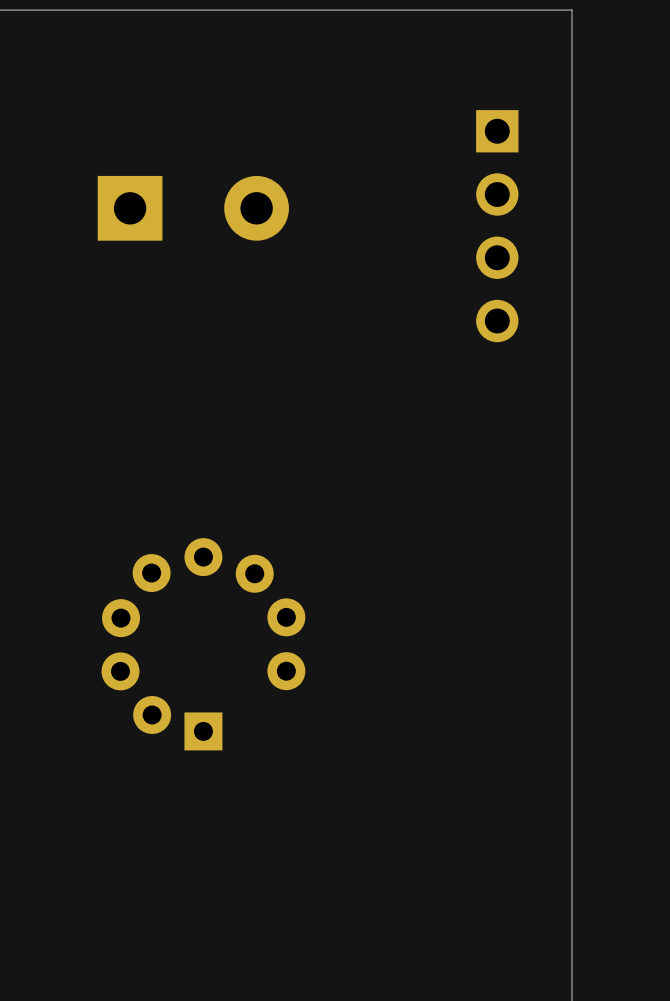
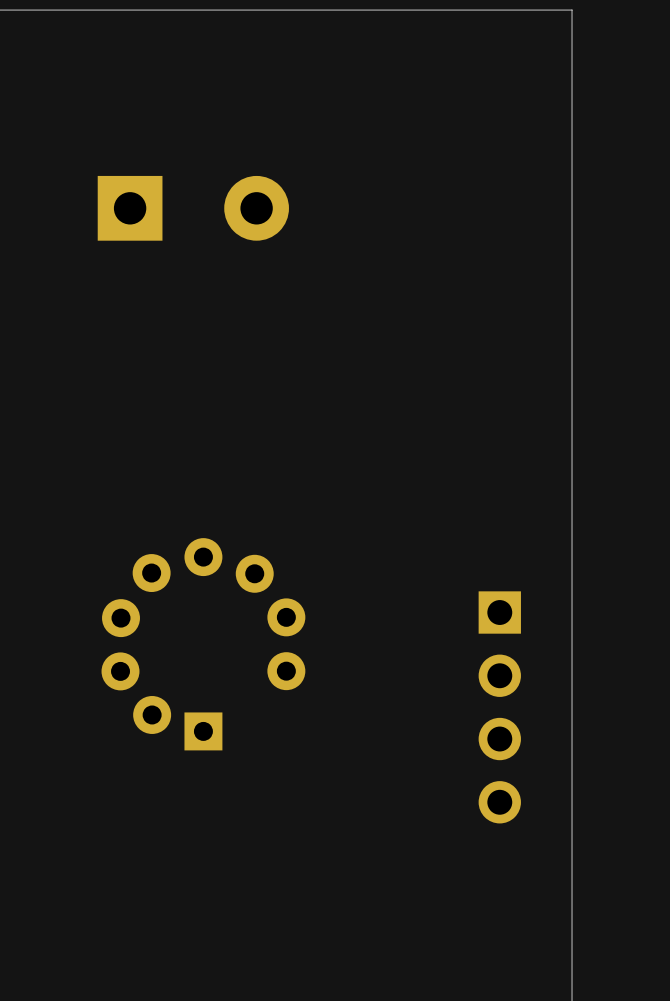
part position: (497, 226) -> (499, 707)

